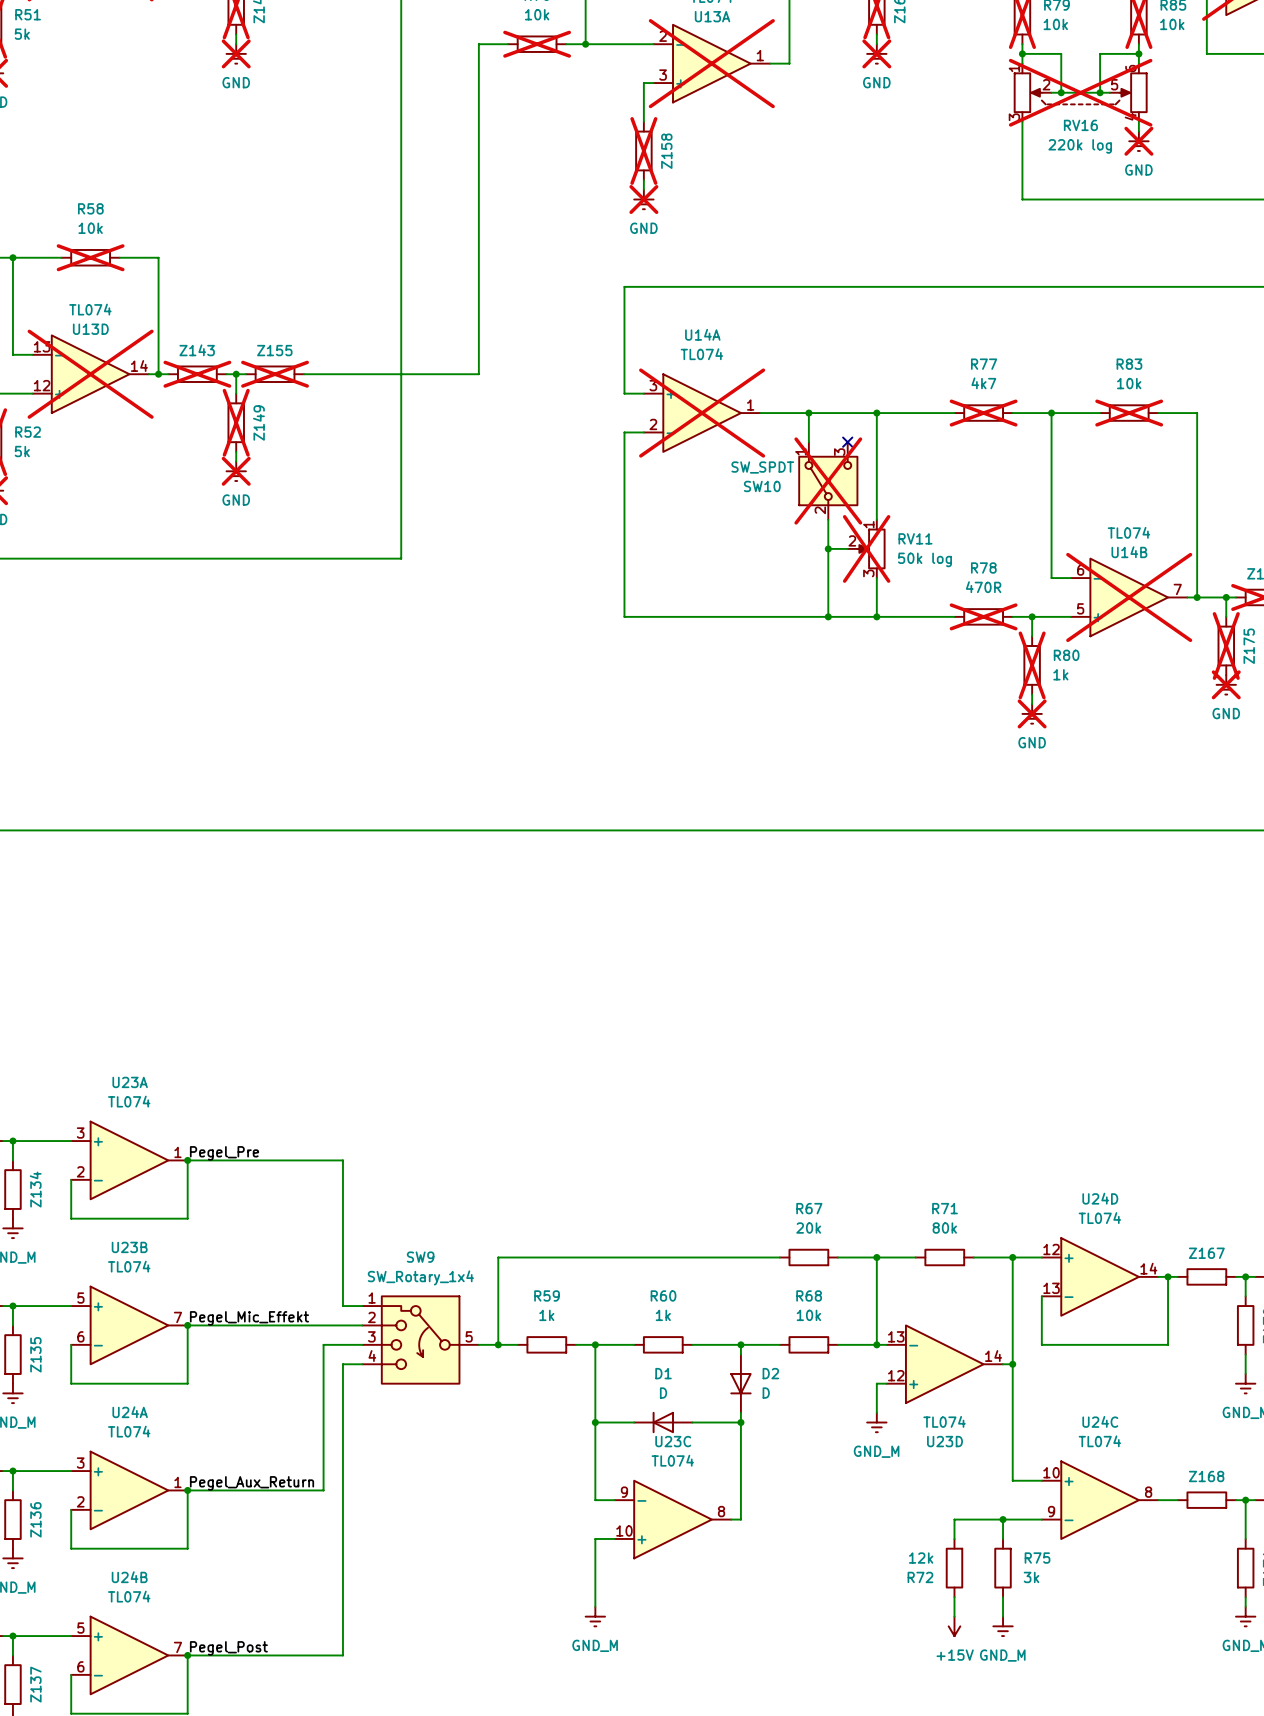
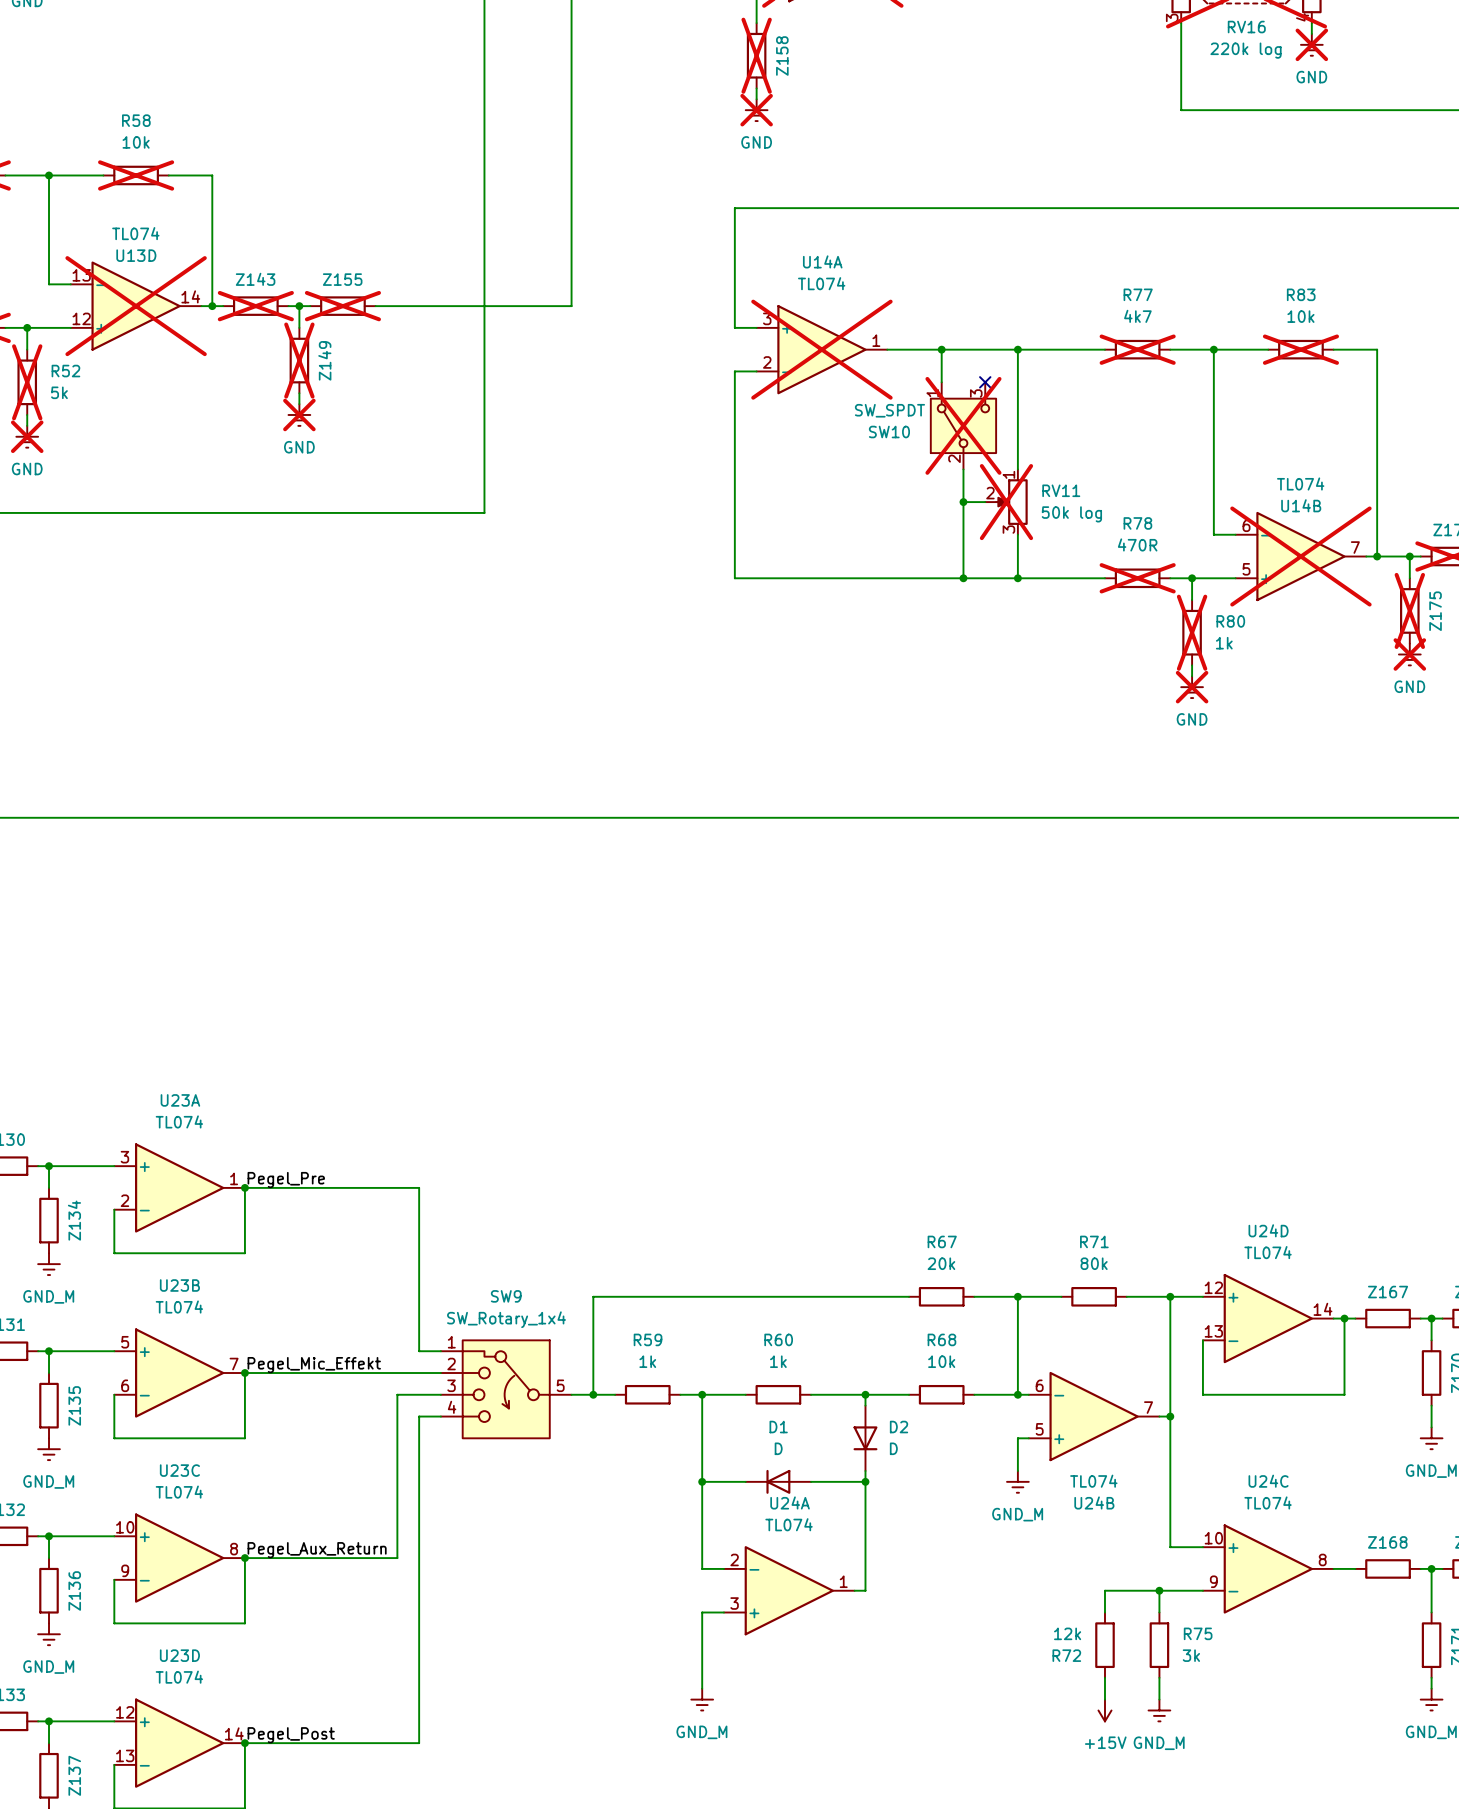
U23D flip: as is (944, 1364) -> up-down (179, 1743)
U23D position: (944, 1364) -> (179, 1743)
U24A flip: as is (129, 1490) -> up-down (789, 1590)
U24A position: (129, 1490) -> (789, 1590)
U23C flip: as is (673, 1519) -> up-down (179, 1558)
U23C position: (673, 1519) -> (179, 1558)
U24B flip: as is (129, 1655) -> up-down (1094, 1416)
U24B position: (129, 1655) -> (1094, 1416)

